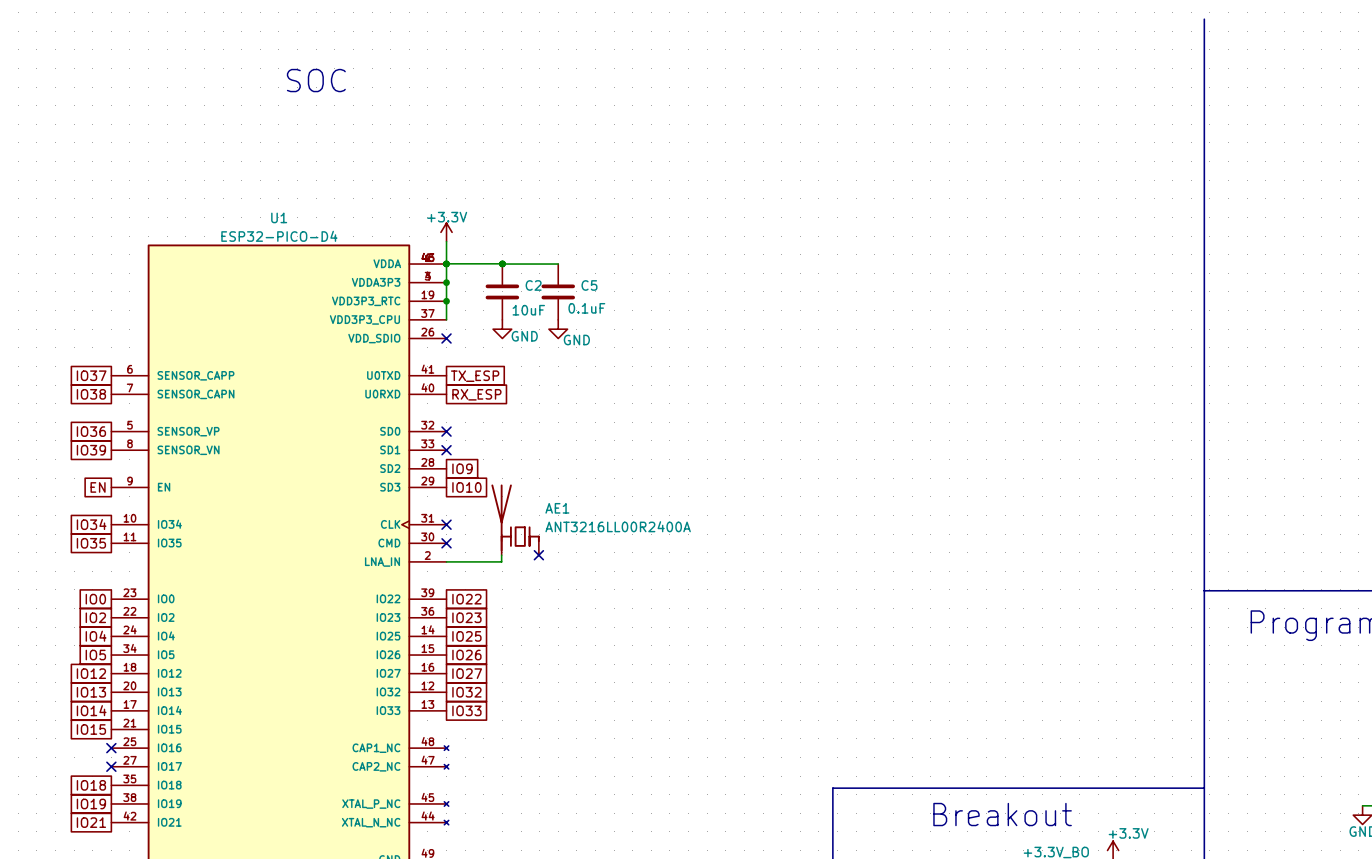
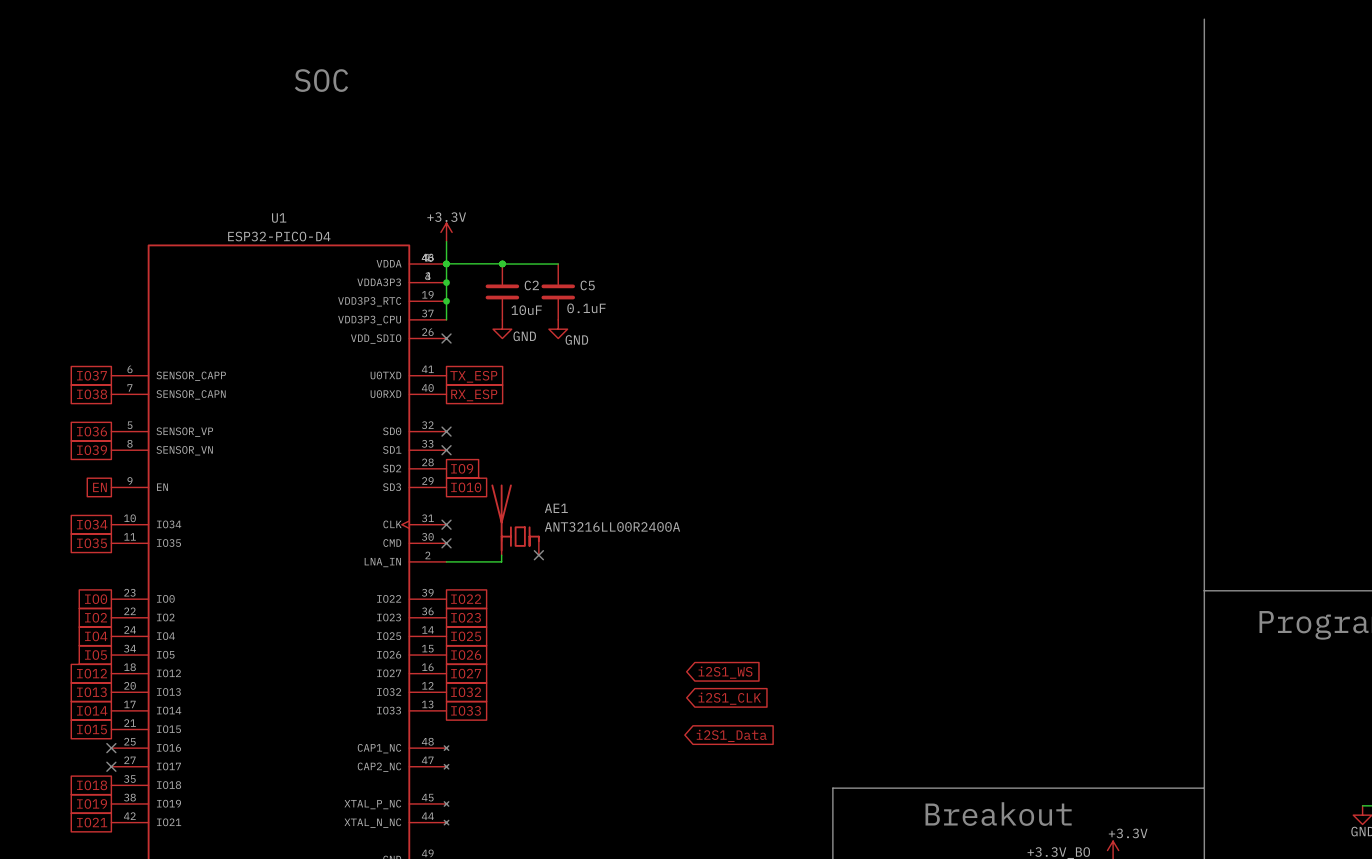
global label: none -> i2S1_WS (725, 672)
global label: none -> i2S1_CLK (729, 698)
global label: none -> i2S1_Data (731, 735)

